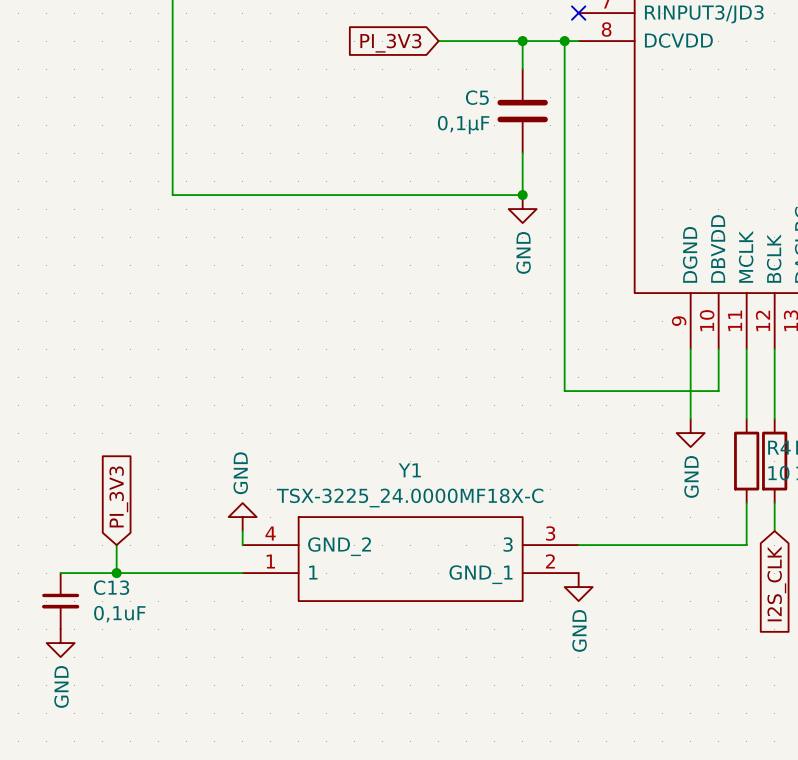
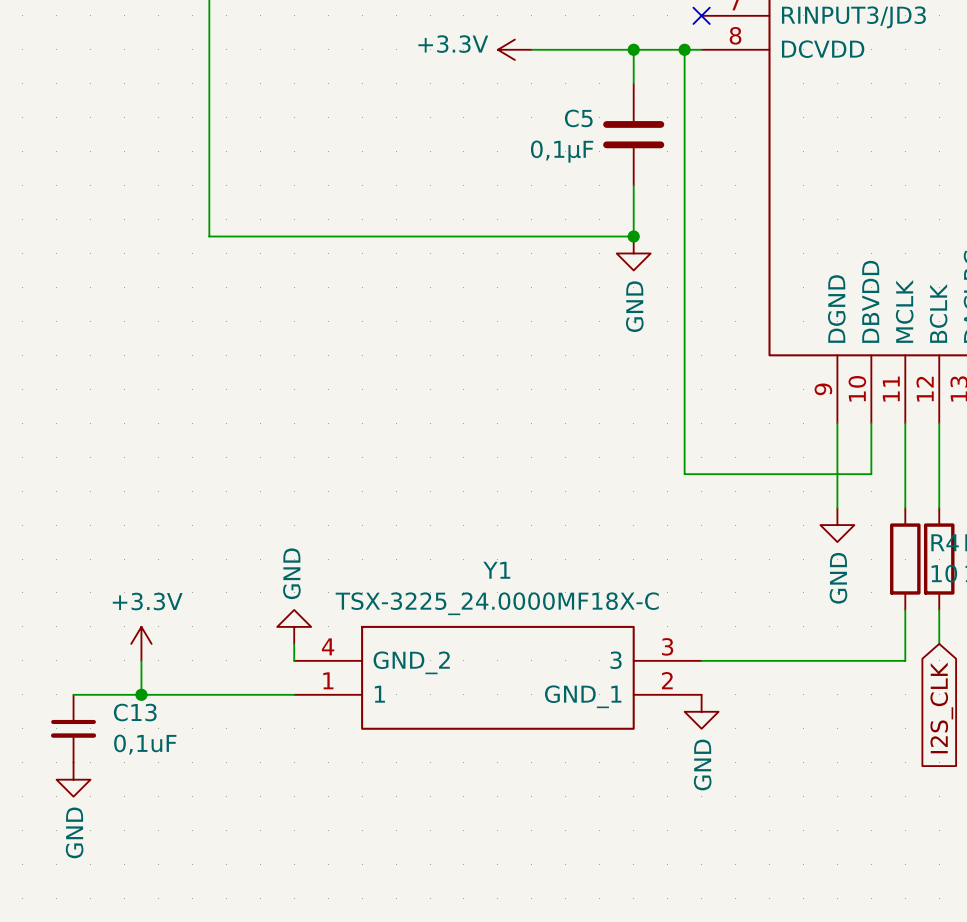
power symbol: none -> +3.3V (514, 49)
global label: PI_3V3 (390, 43) -> none
global label: PI_3V3 (118, 496) -> none
power symbol: none -> +3.3V (141, 643)

